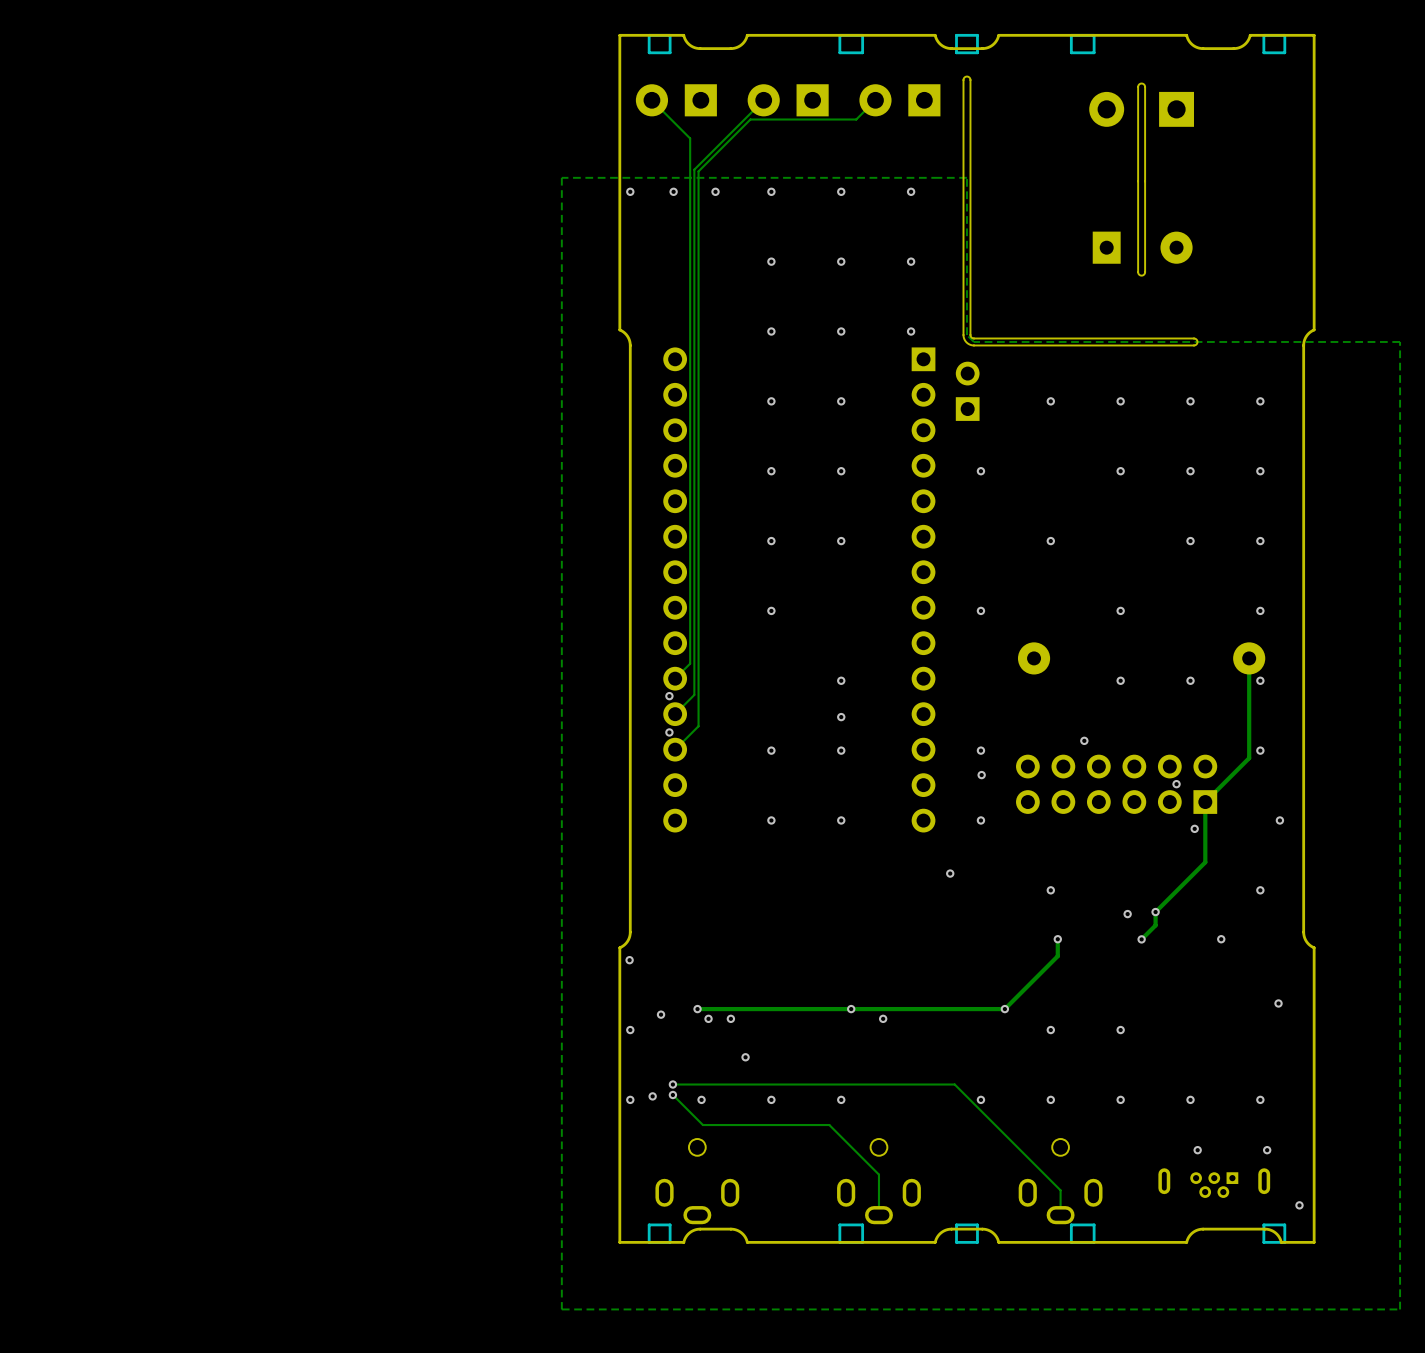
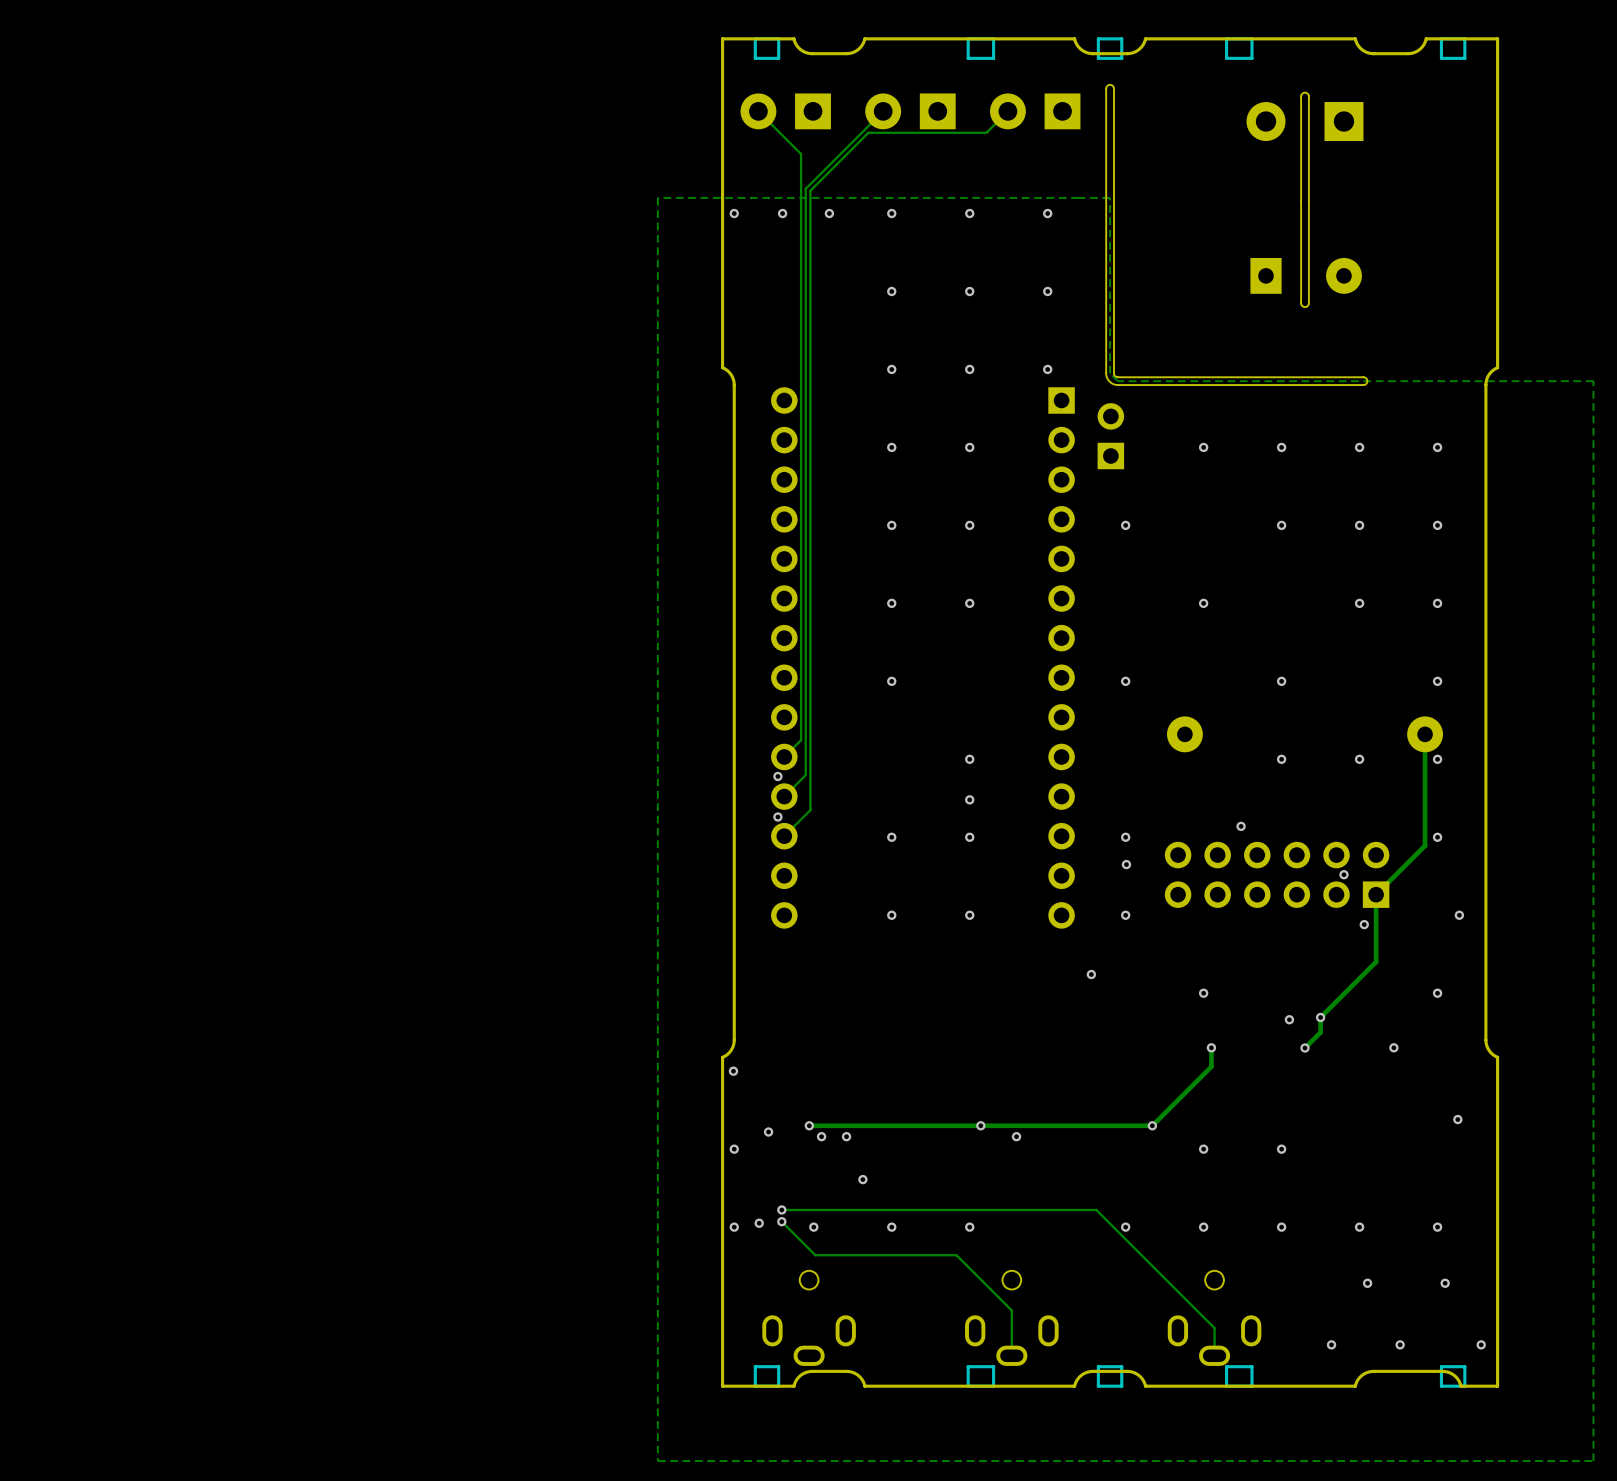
part: (1214, 1183) -> none
via: none -> (1331, 1344)
via: none -> (1400, 1344)

